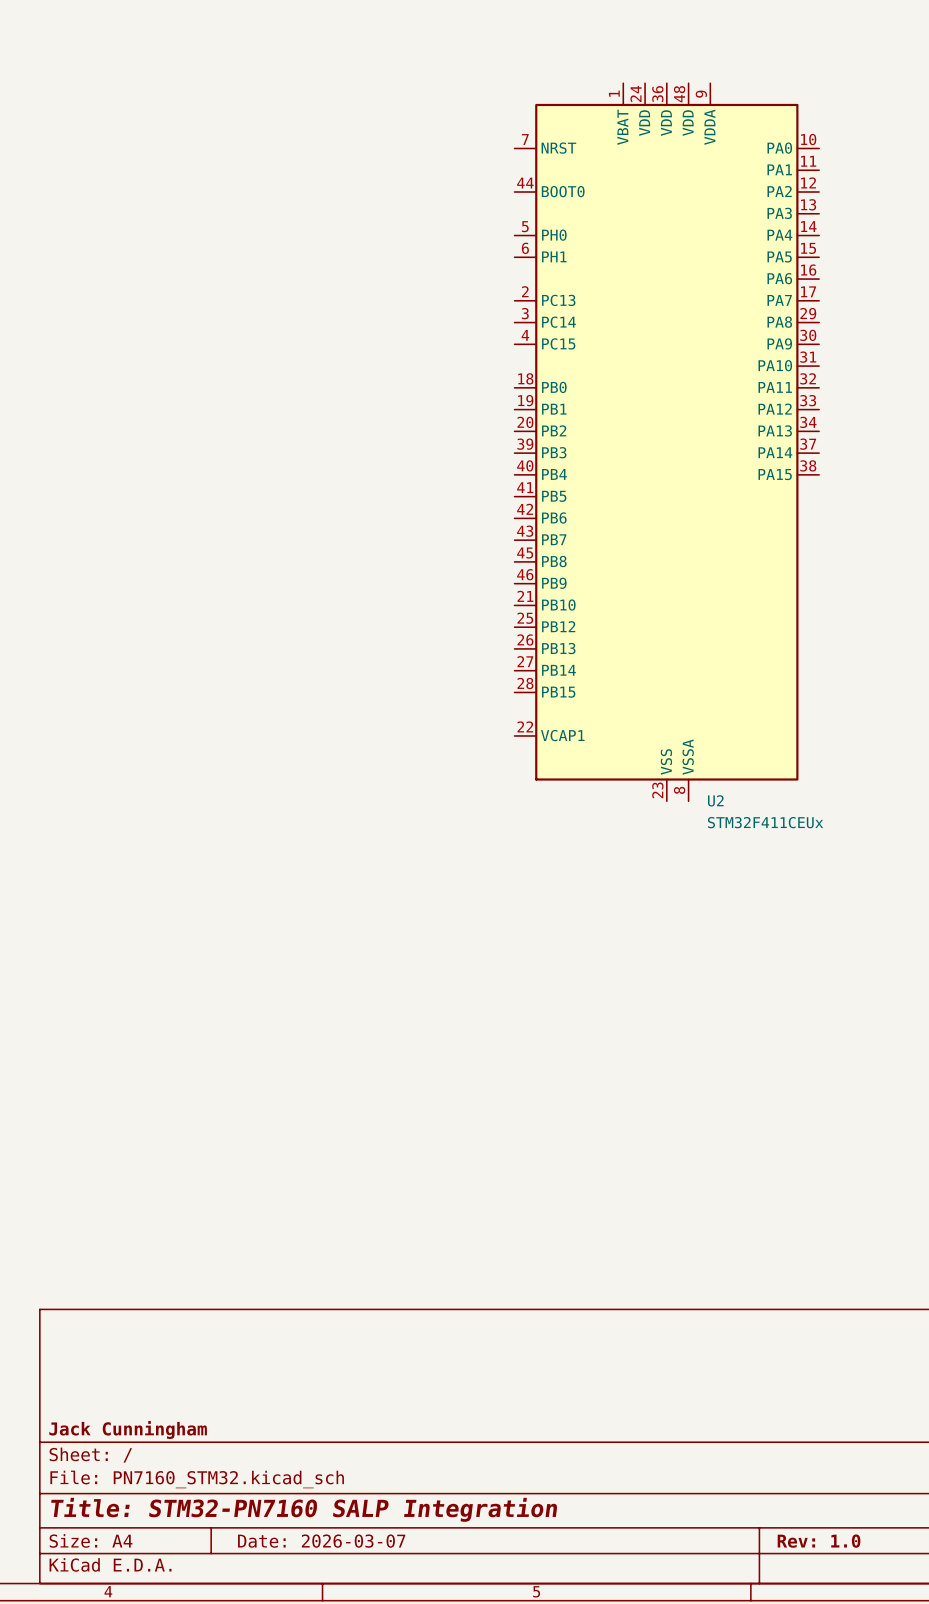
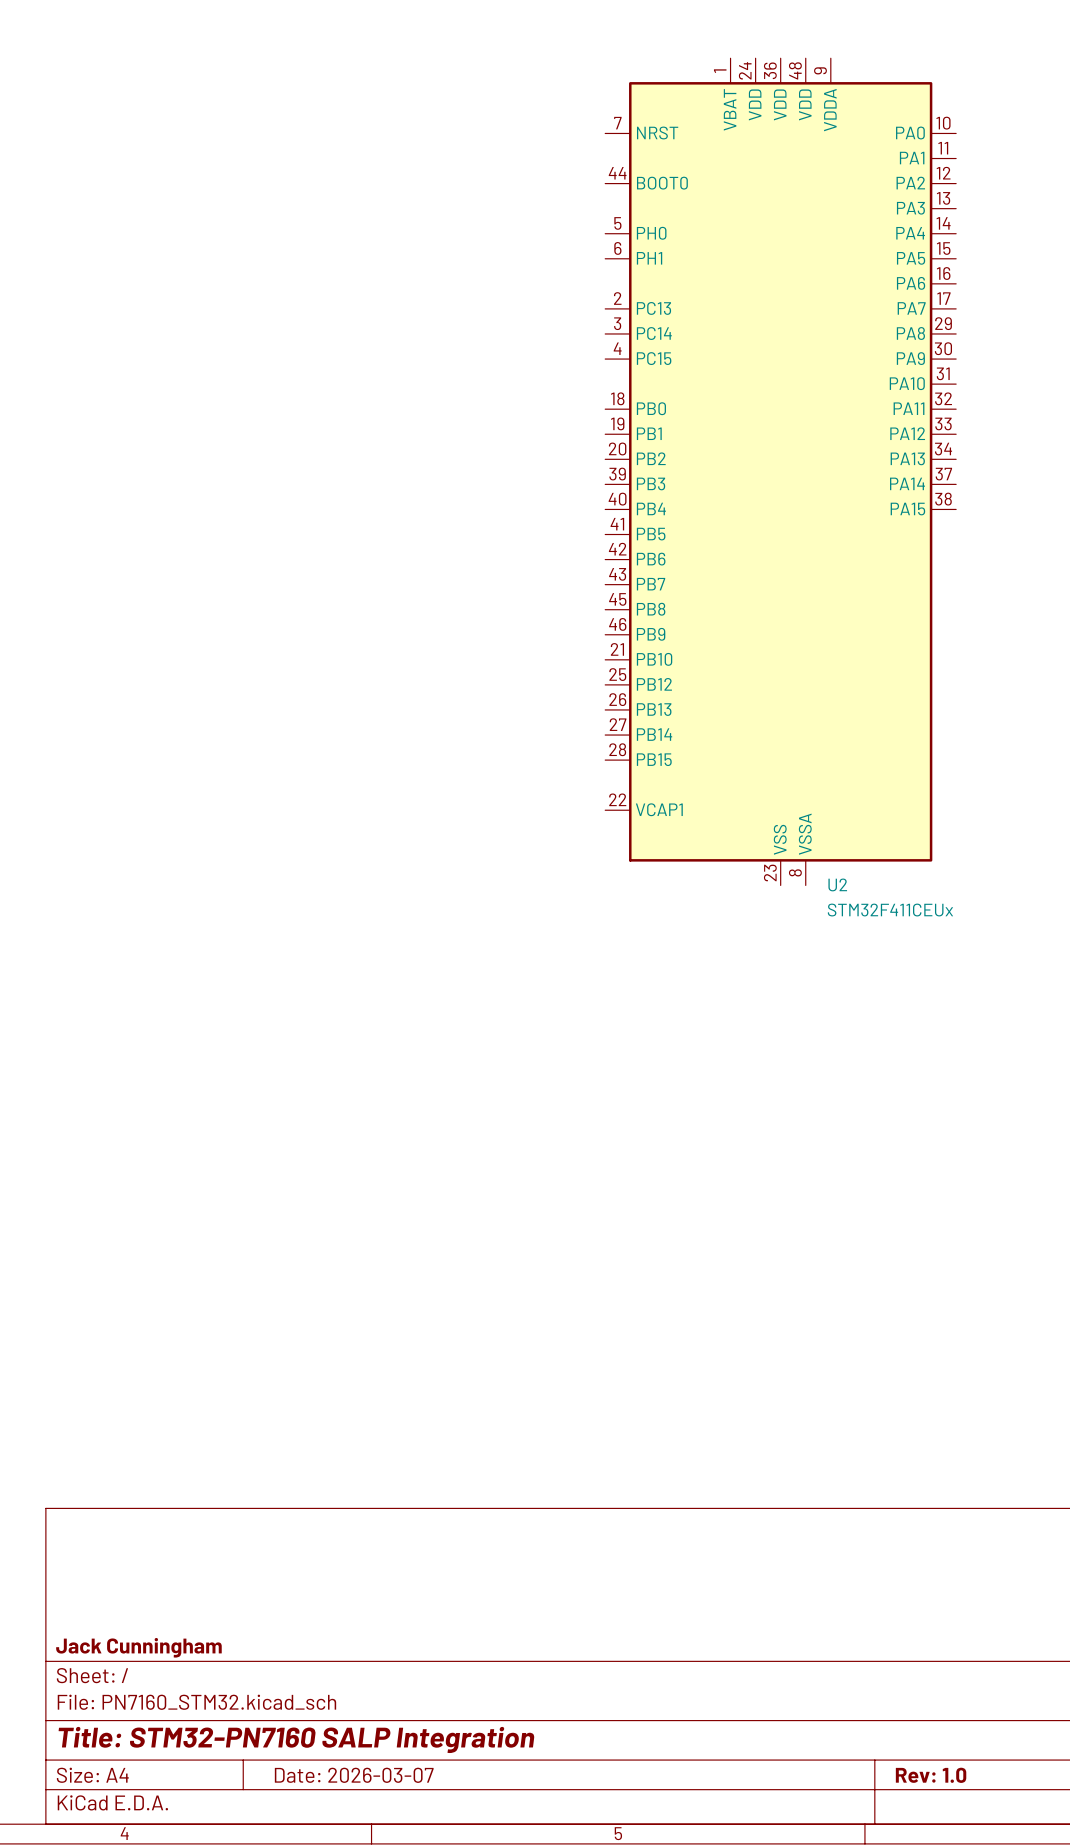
U2 position: (666, 442) -> (780, 471)

